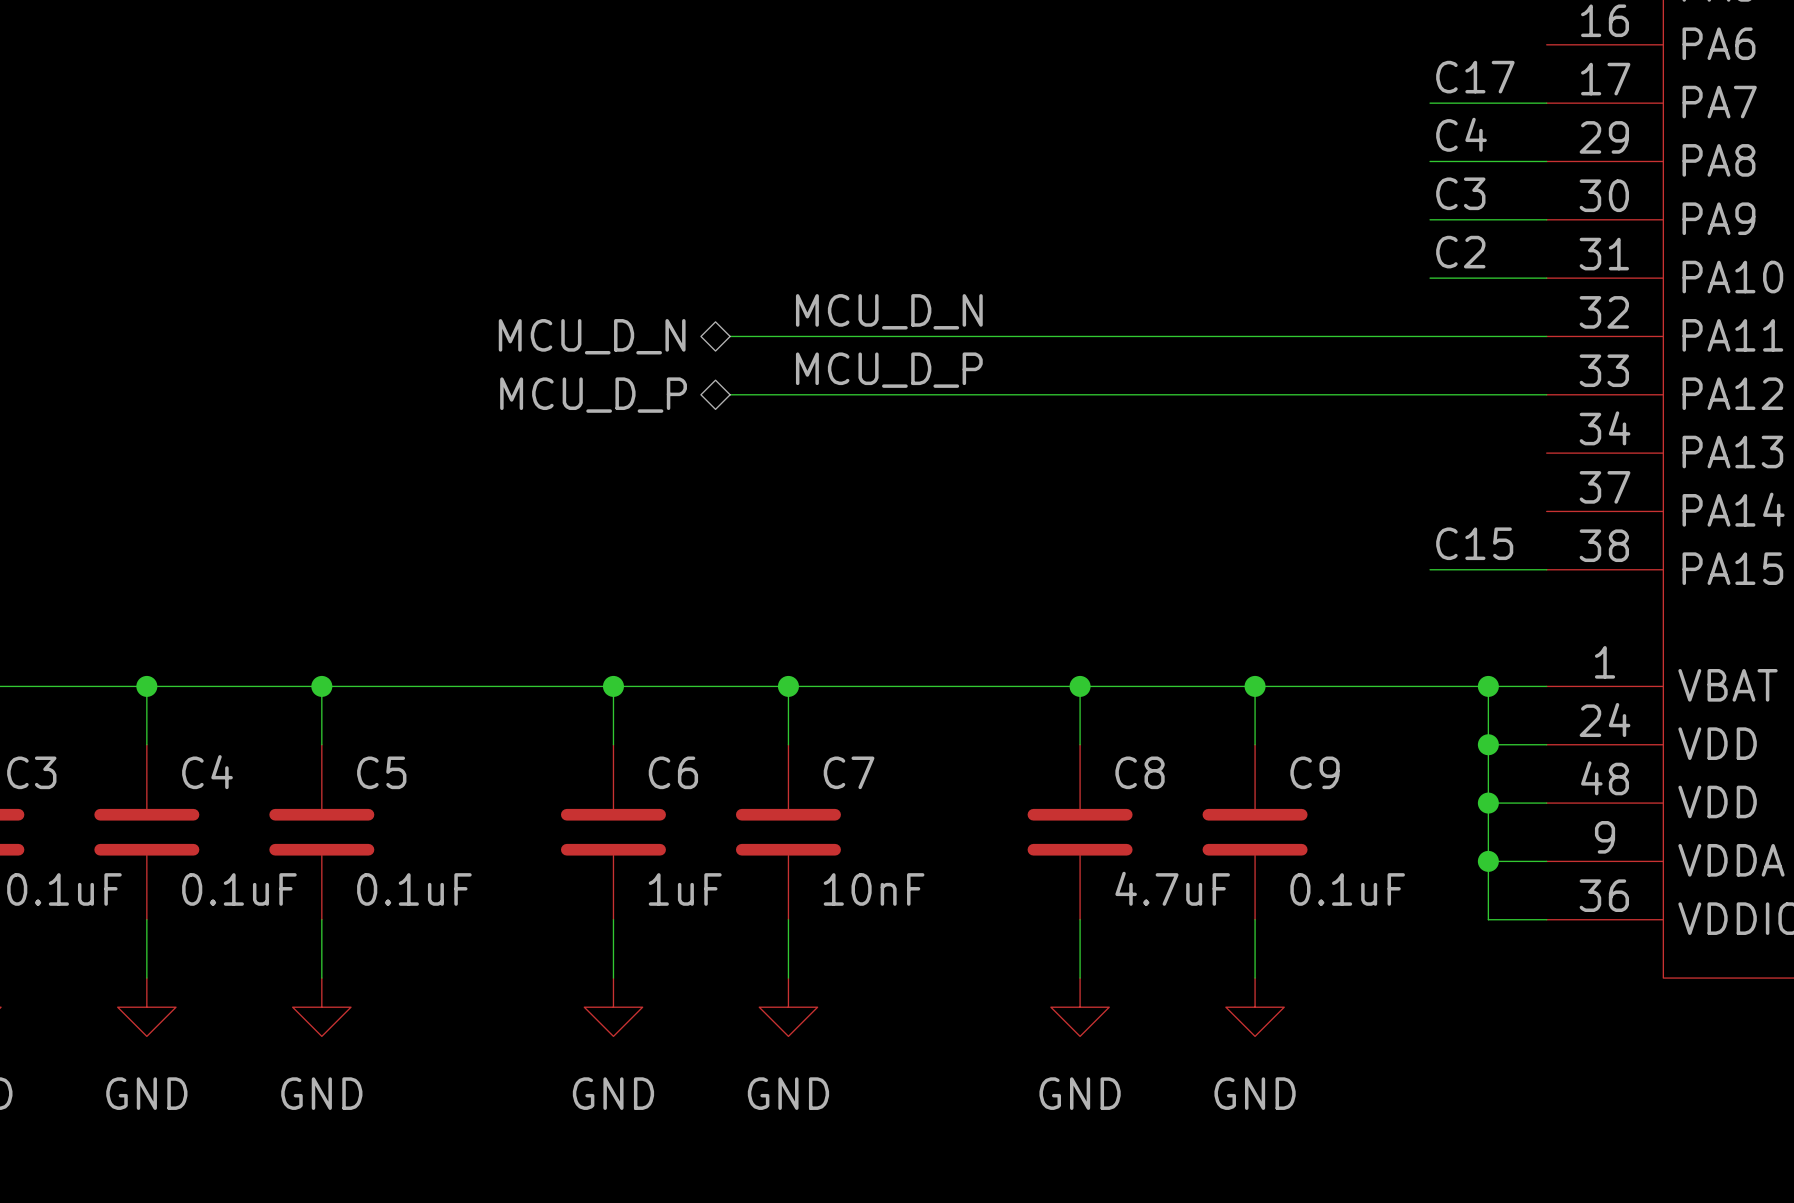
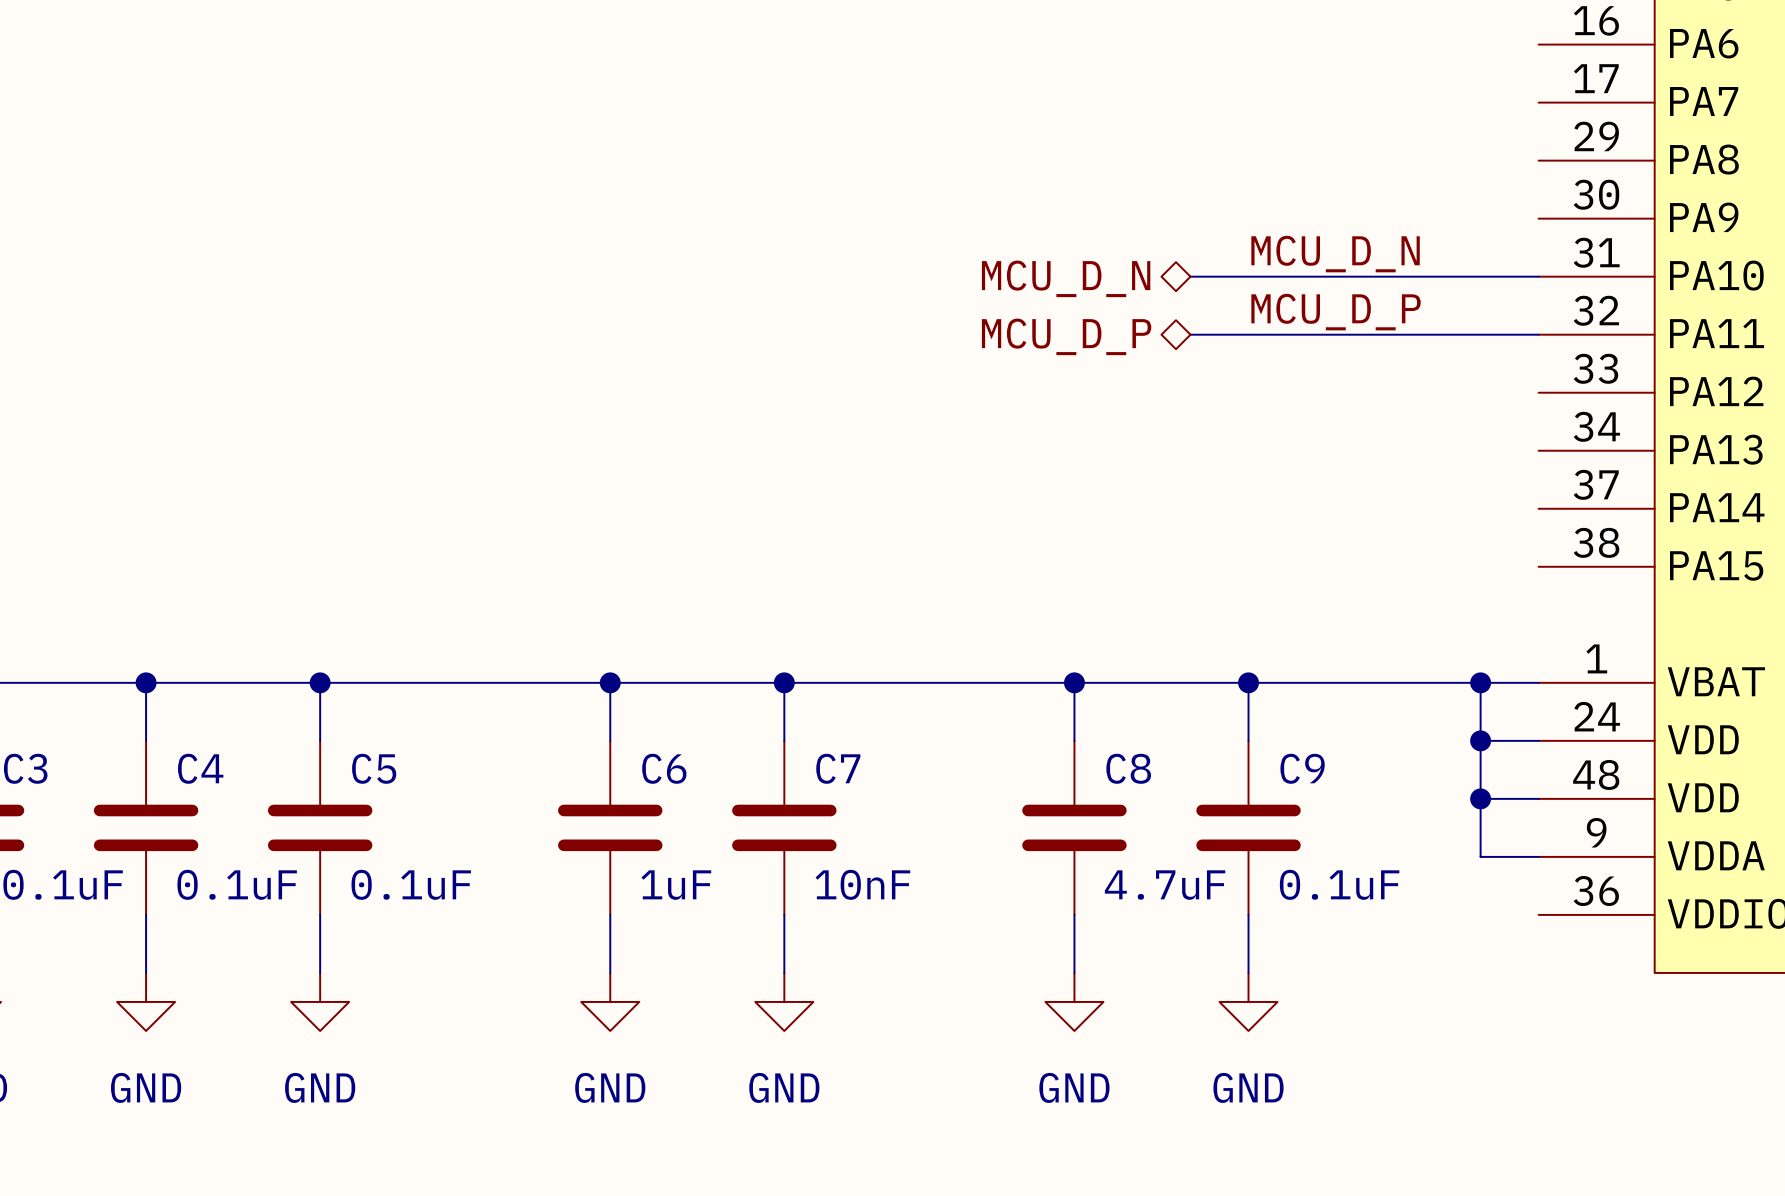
label: C17 (1475, 77) -> none
wire: (1430, 103) (1546, 103) -> none
label: C4 (1461, 134) -> none
wire: (1430, 161) (1546, 161) -> none
label: C3 (1460, 193) -> none
wire: (1430, 219) (1546, 219) -> none
label: C2 (1460, 252) -> none
wire: none -> (1190, 276) (1422, 276)
label position: MCU_D_N (889, 311) -> MCU_D_N (1335, 254)
hierarchical label position: MCU_D_N (592, 336) -> MCU_D_N (1066, 278)
wire: (730, 336) (1196, 336) -> none
label position: MCU_D_P (889, 370) -> MCU_D_P (1336, 312)
wire: (730, 394) (1546, 394) -> none
hierarchical label position: MCU_D_P (593, 395) -> MCU_D_P (1066, 336)
label: C15 (1474, 543) -> none
wire: (1430, 569) (1546, 569) -> none
wire: (1488, 861) (1488, 919) (1546, 919) -> none
junction: (1488, 861) -> none

